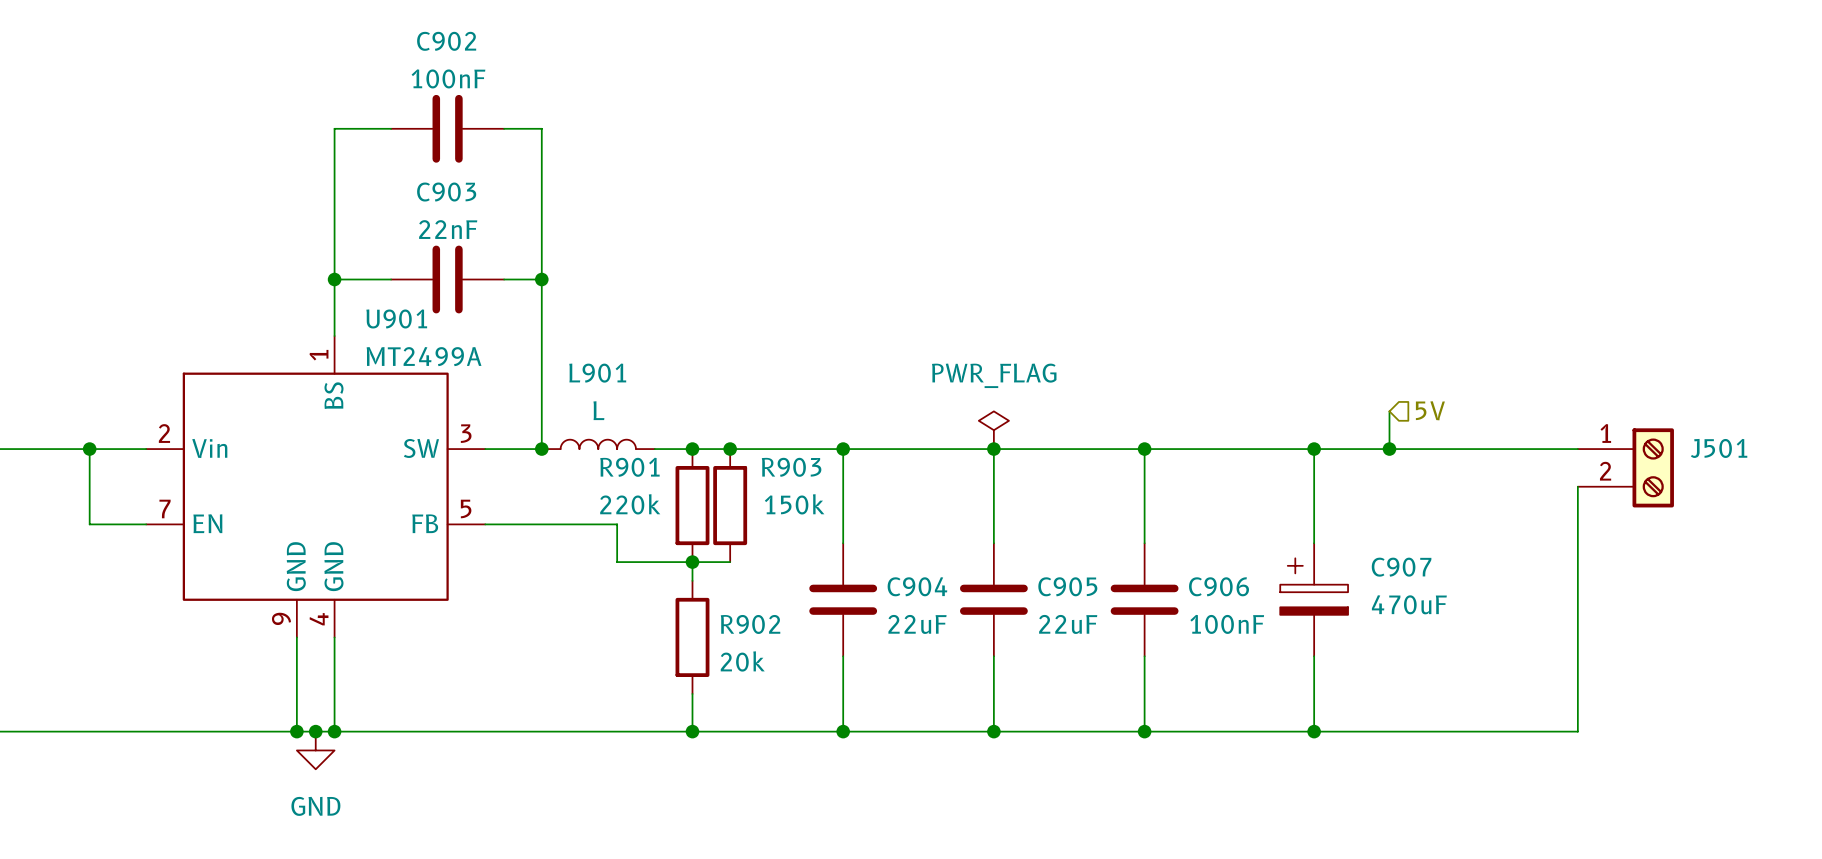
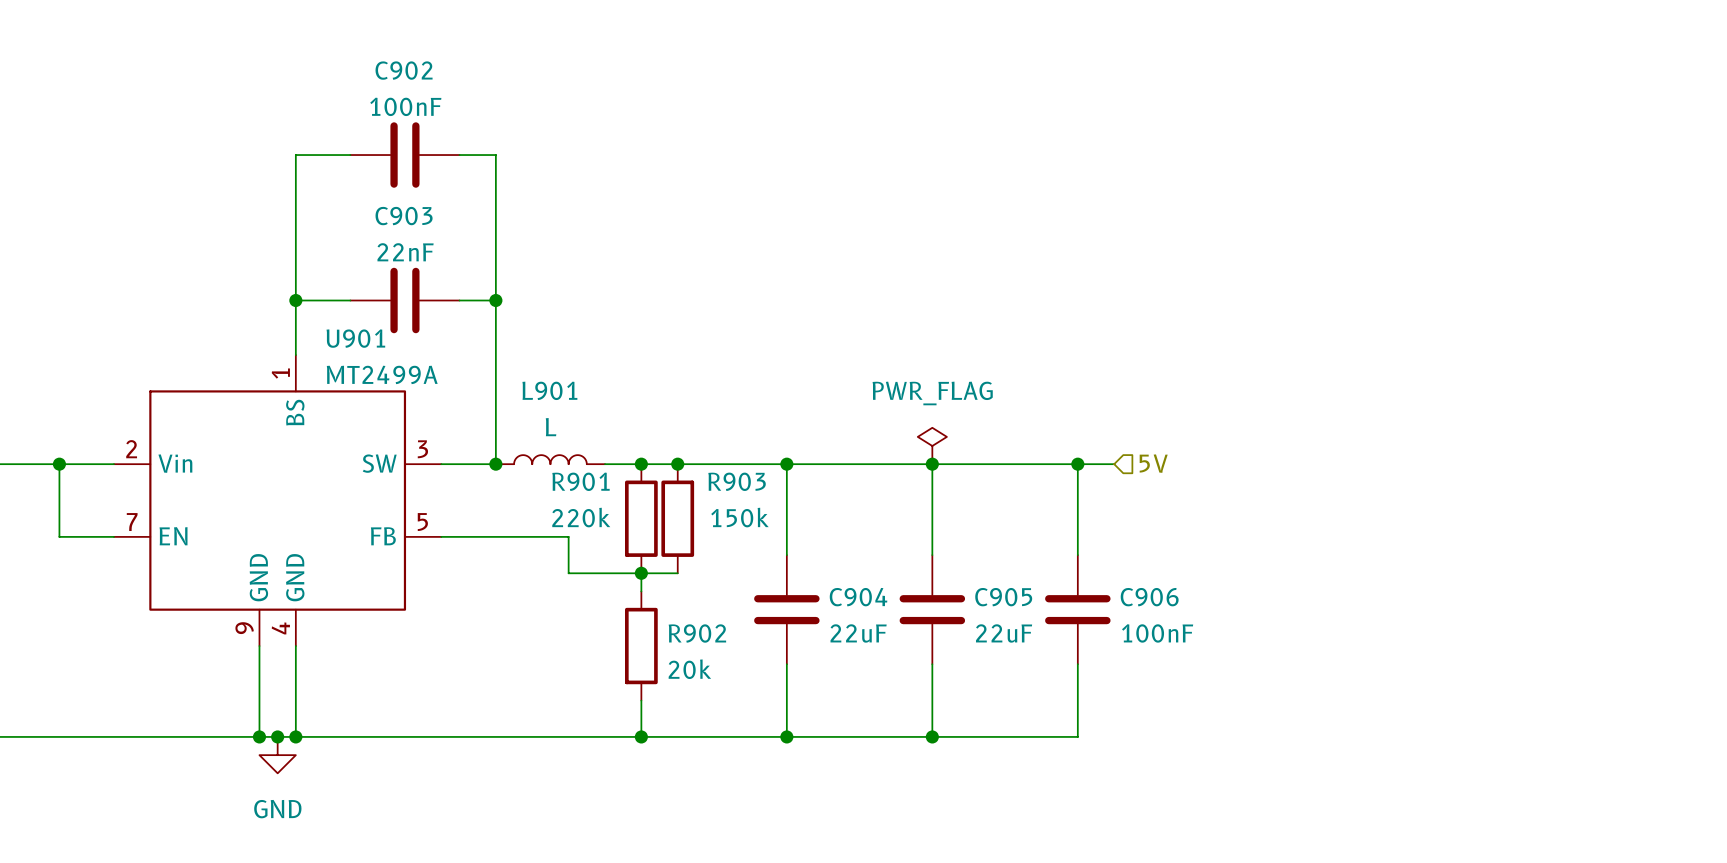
hierarchical label position: 5V (1430, 410) -> 5V (1153, 463)
wire: (1389, 411) (1389, 449) -> none
wire: (1182, 449) (1577, 449) -> none
wire: (1314, 449) (1314, 543) -> none
junction: (1314, 449) -> none
junction: (1389, 449) -> none
J501: (1625, 467) -> none
wire: (1577, 486) (1577, 731) (1144, 731) -> none
C907: 470uF (1314, 599) -> none
wire: (1314, 656) (1314, 731) -> none
junction: (1144, 731) -> none
junction: (1314, 731) -> none

